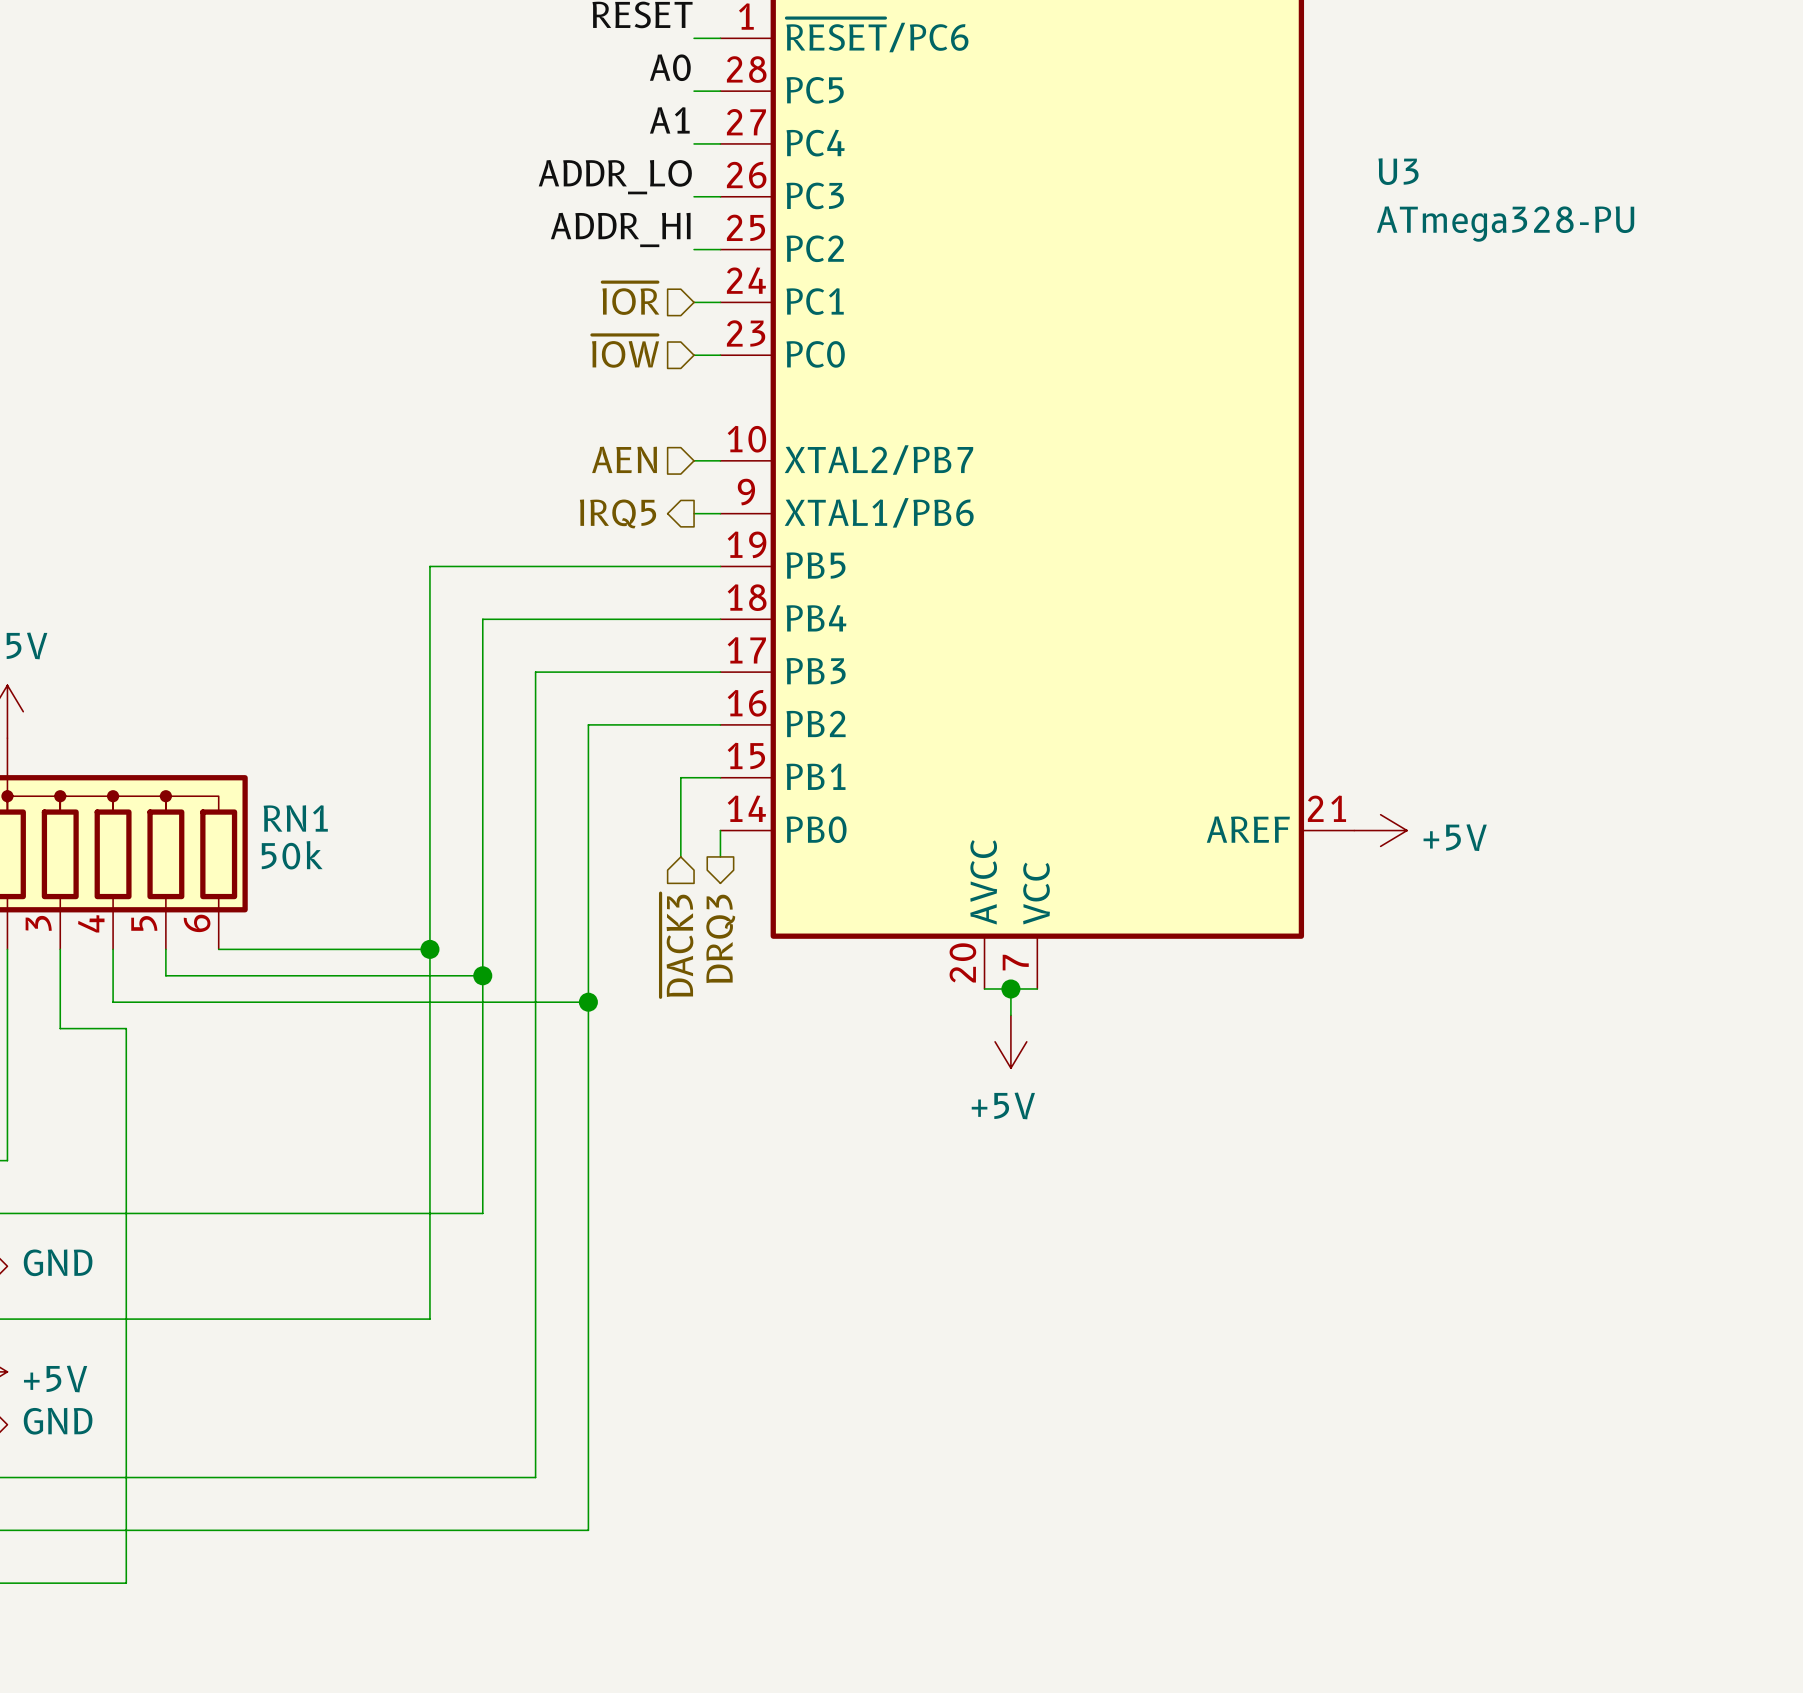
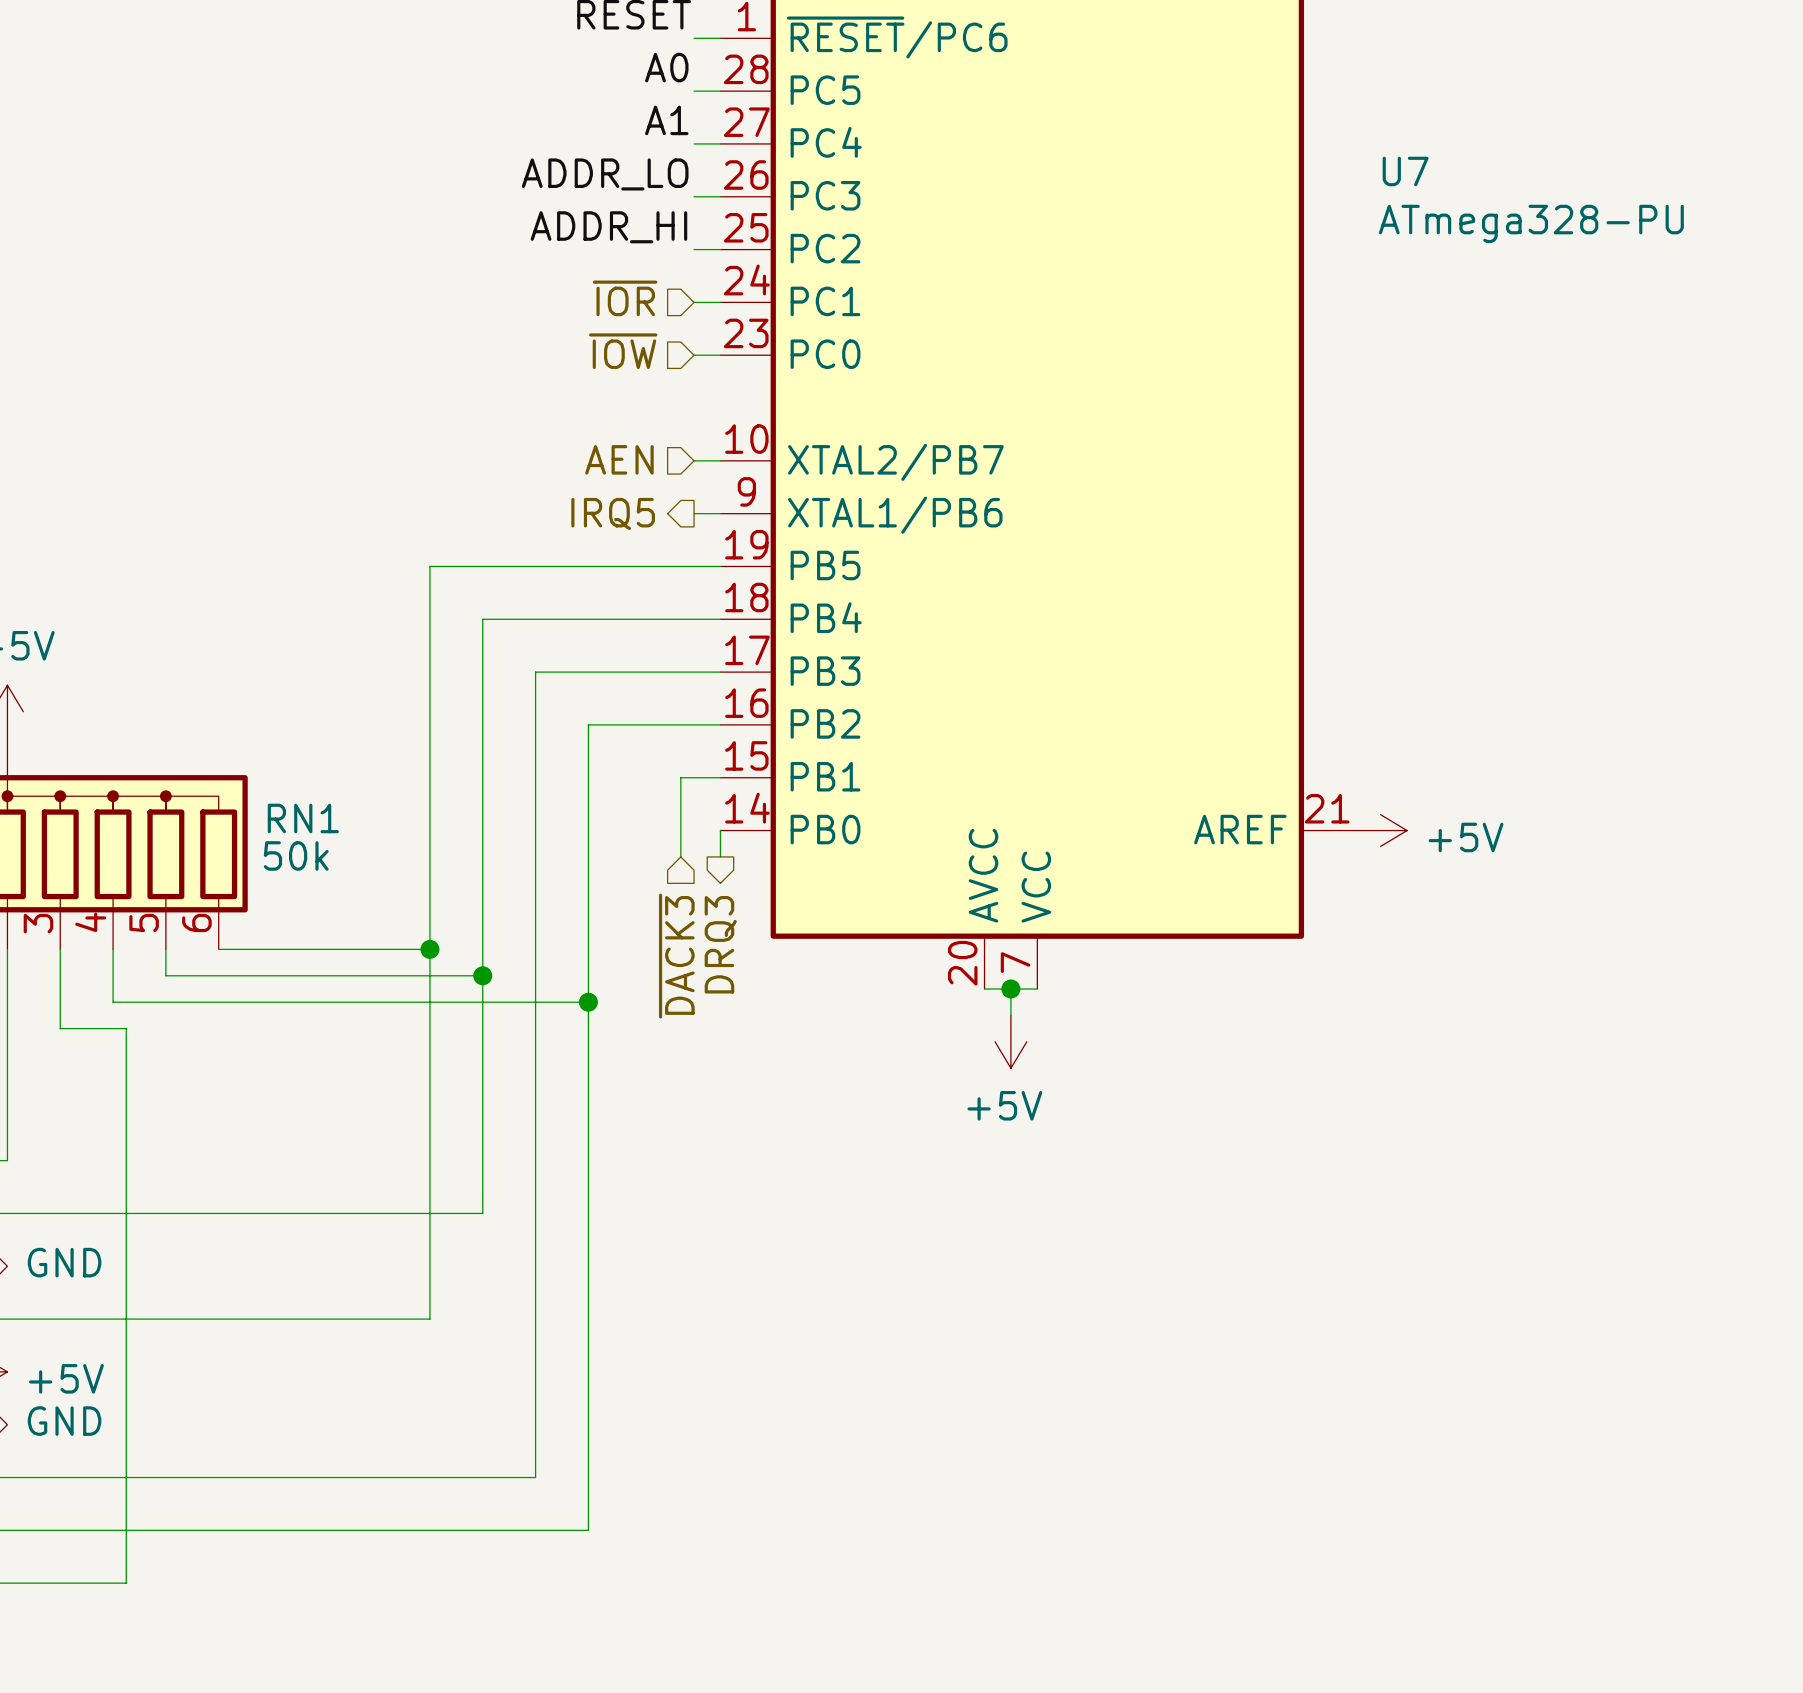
U3 name: U3 (1398, 171) -> U7 (1405, 171)

